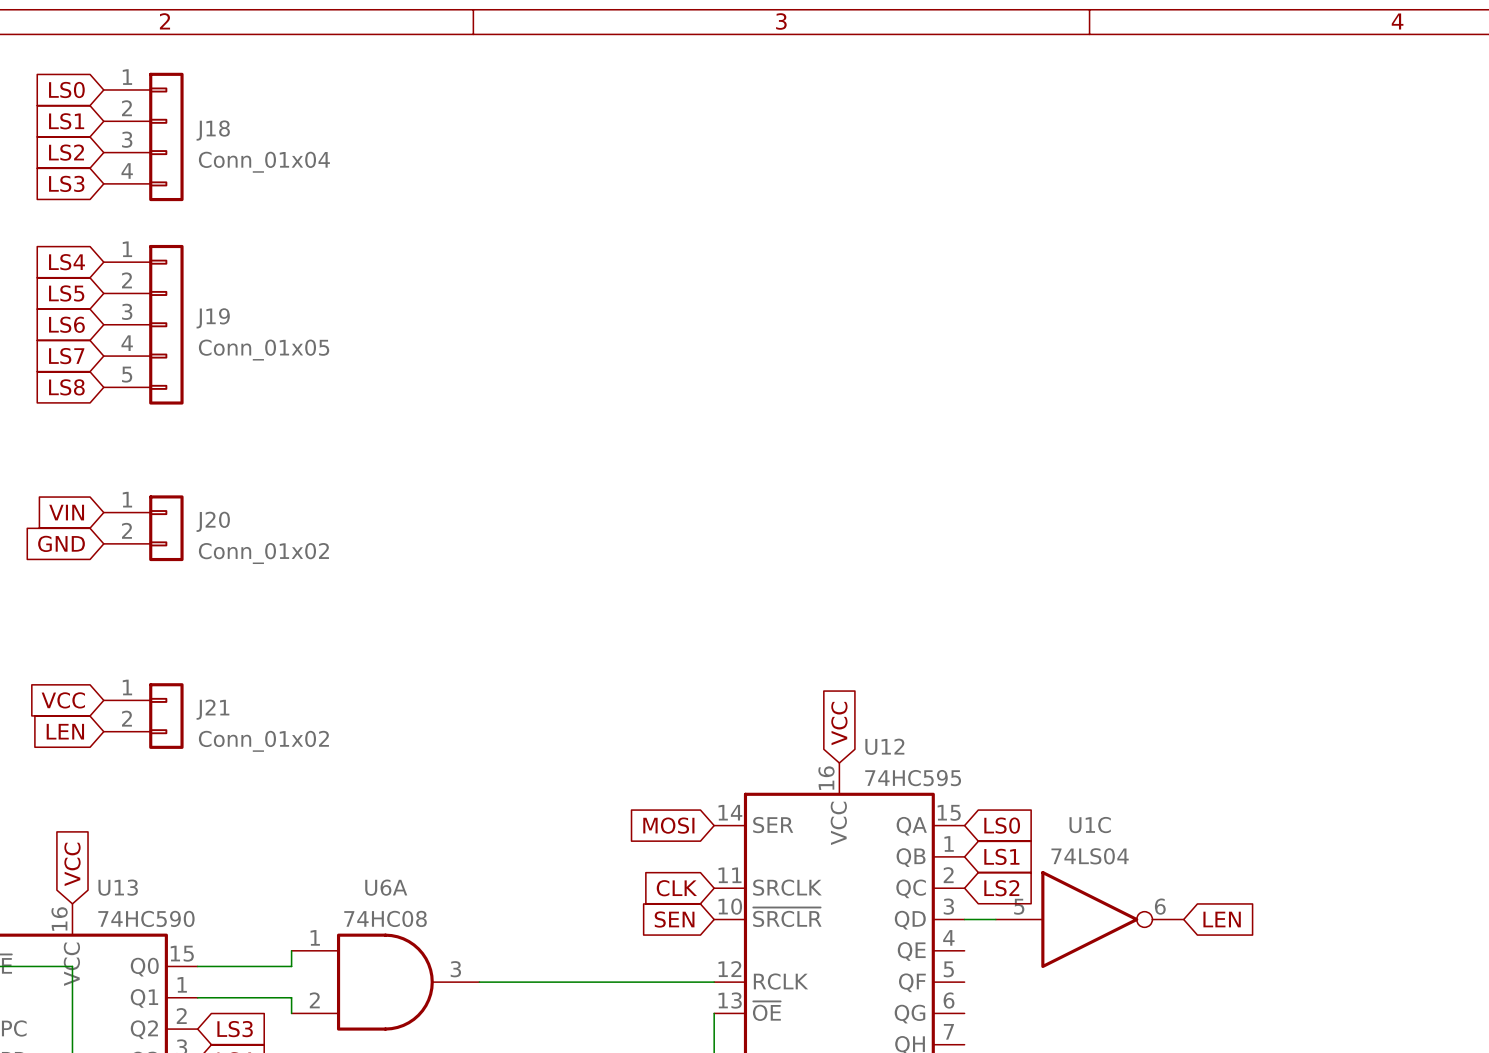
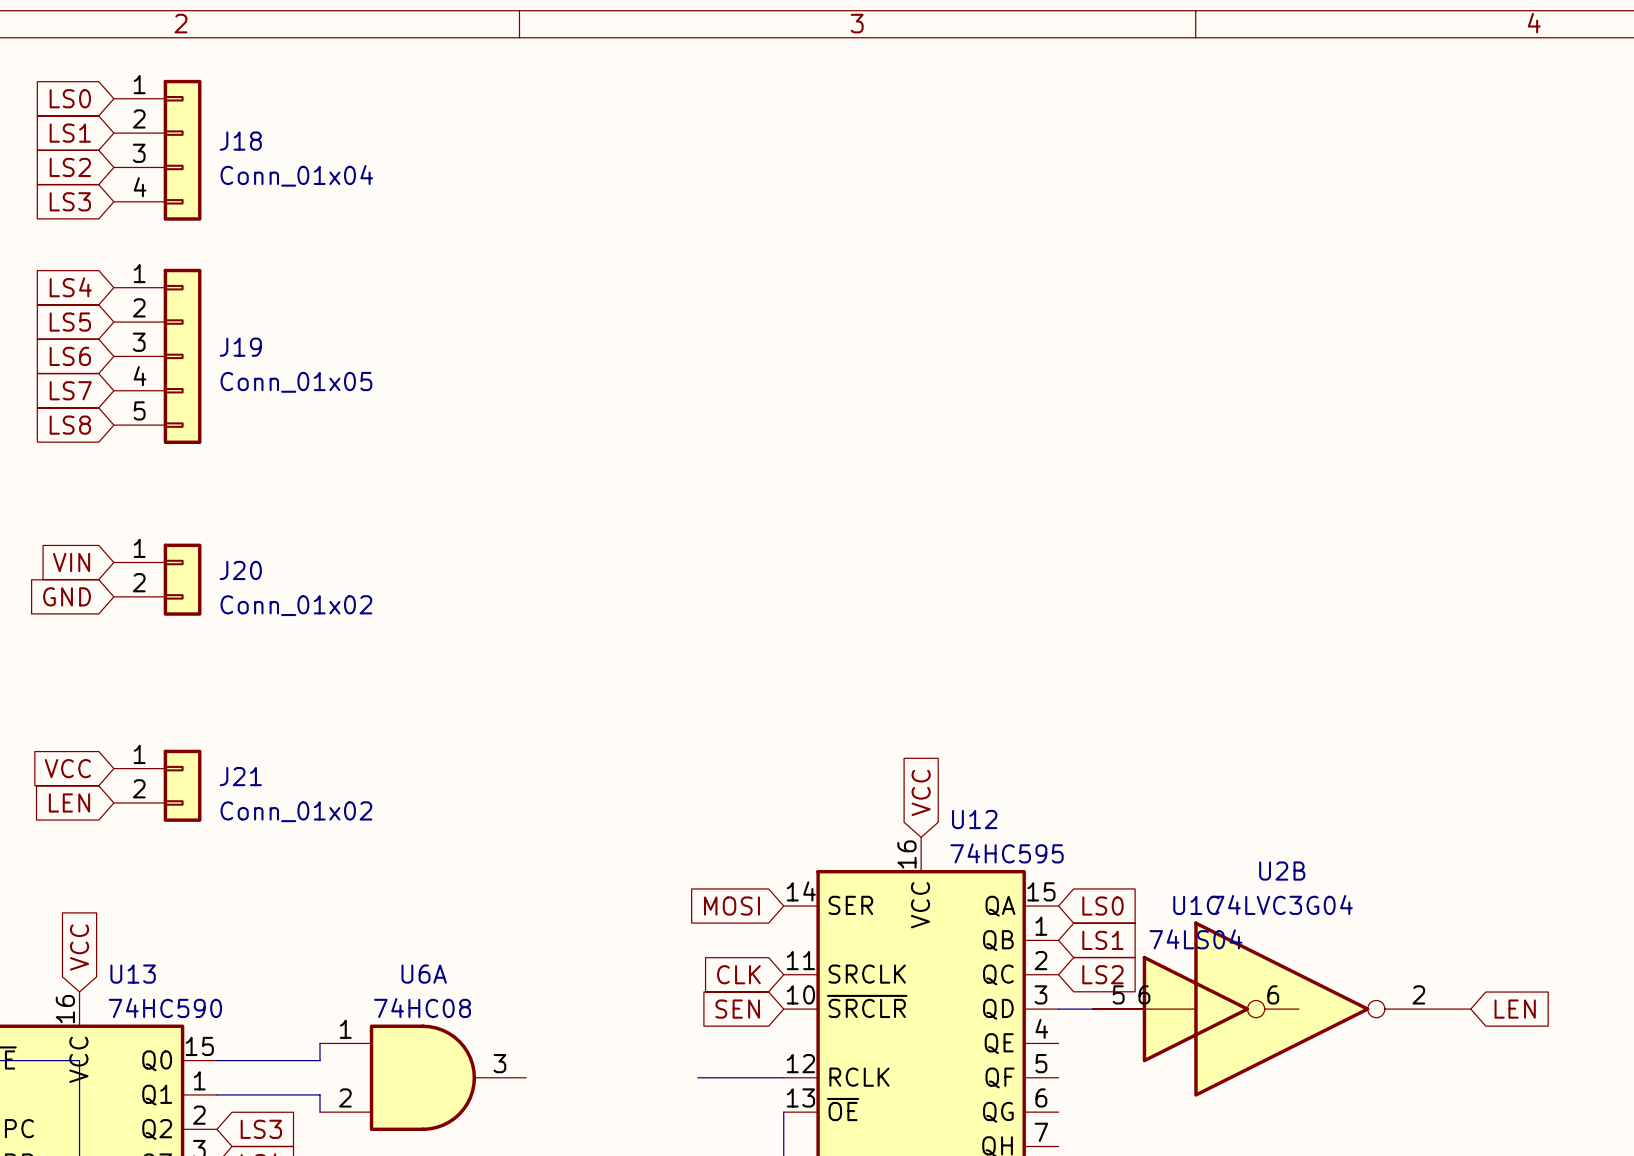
U2B: none -> 74LVC3G04 (1281, 1009)
global label position: LEN (1222, 919) -> LEN (1515, 1009)
wire: (479, 982) (635, 982) -> none

